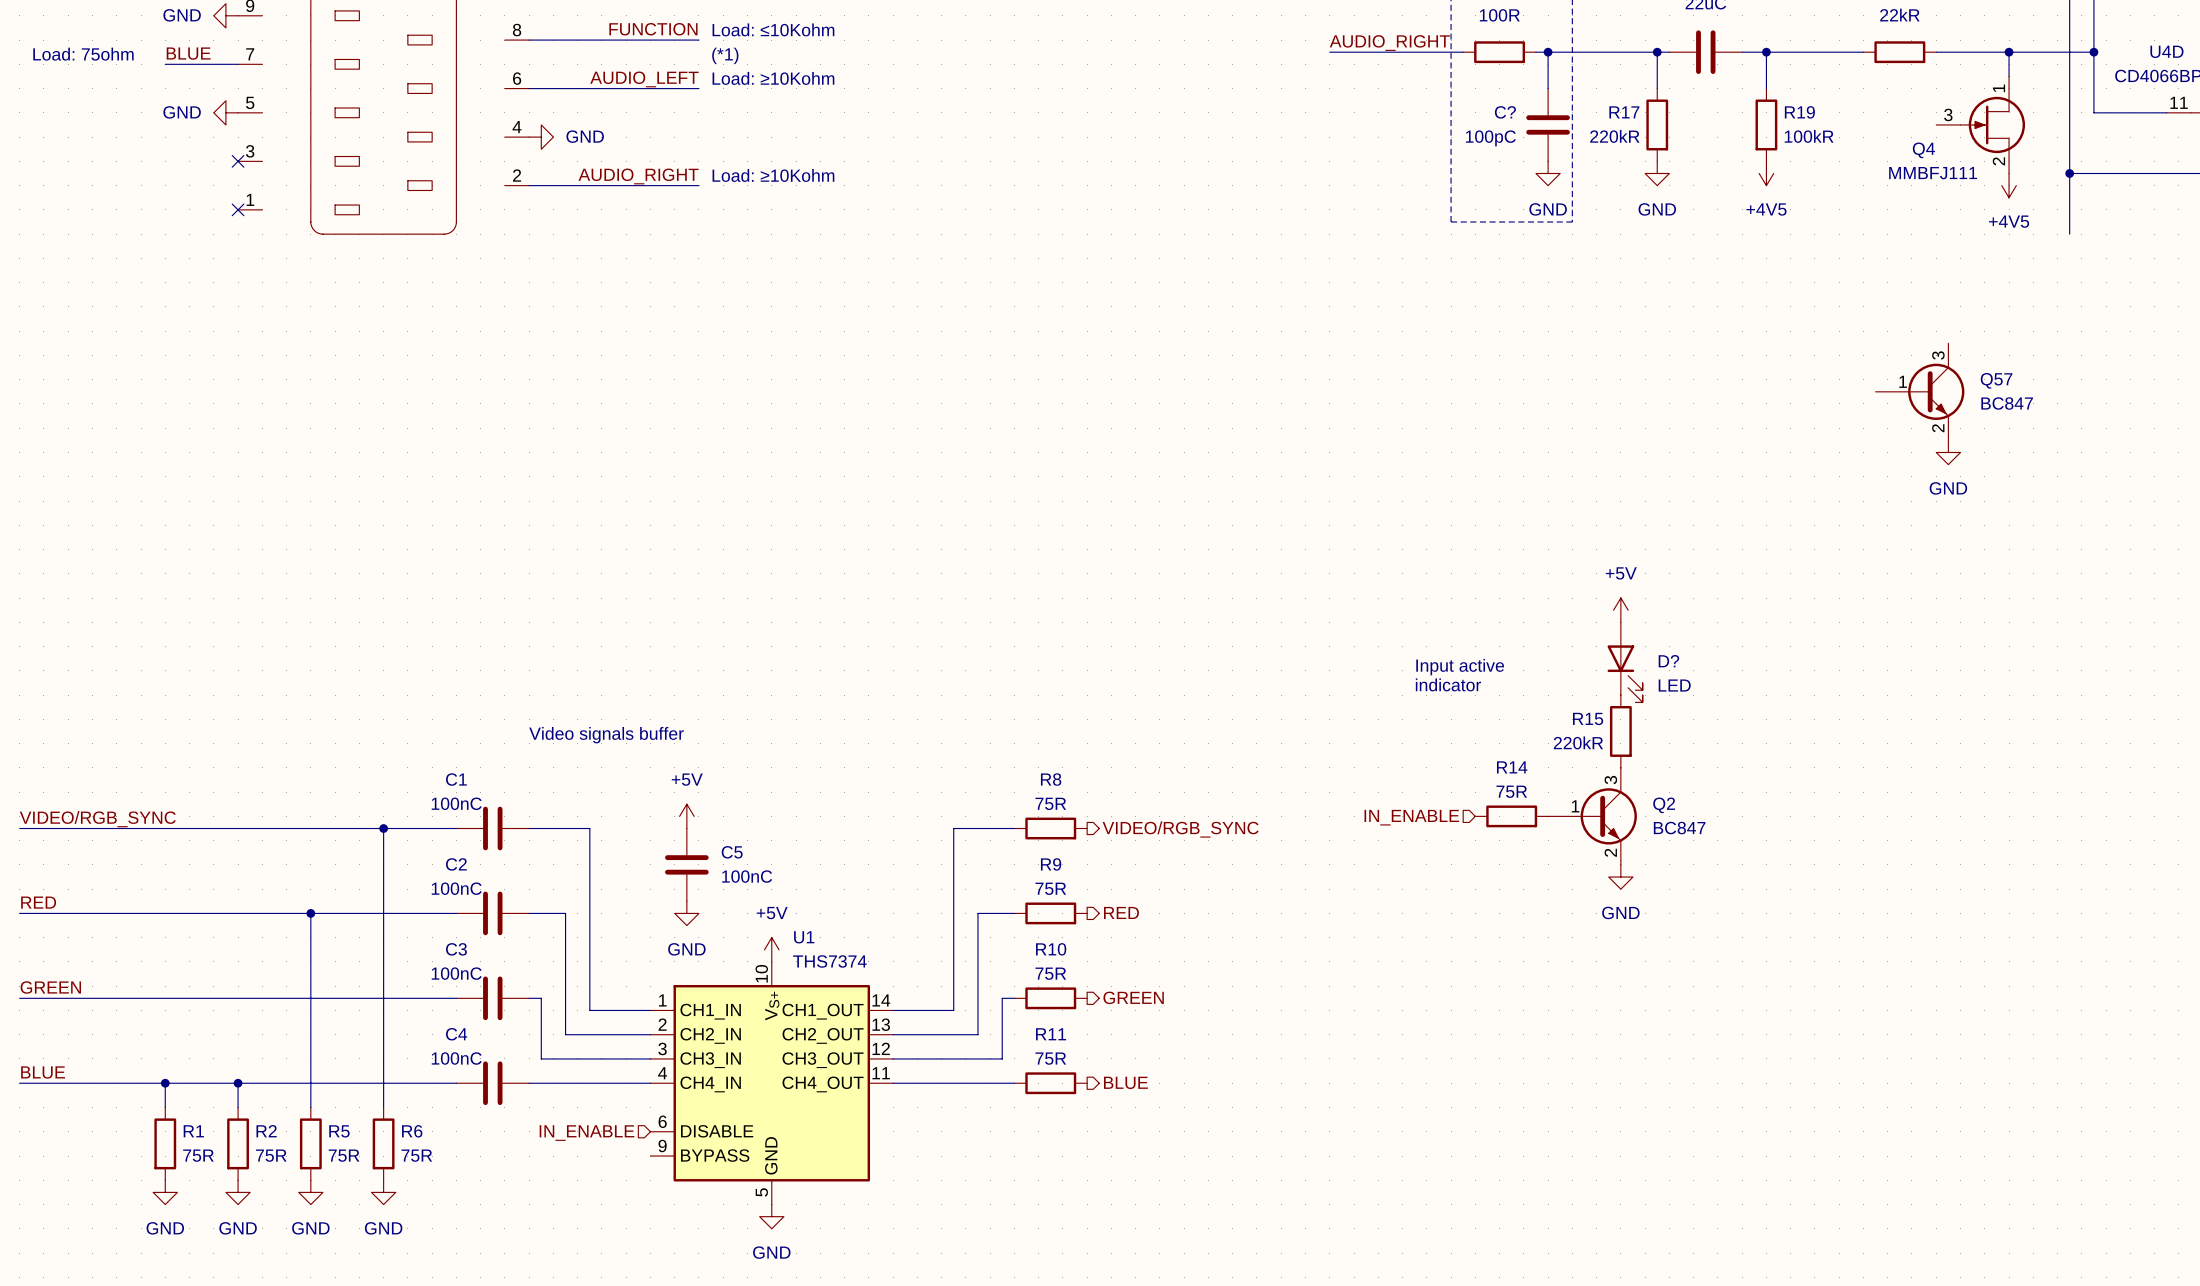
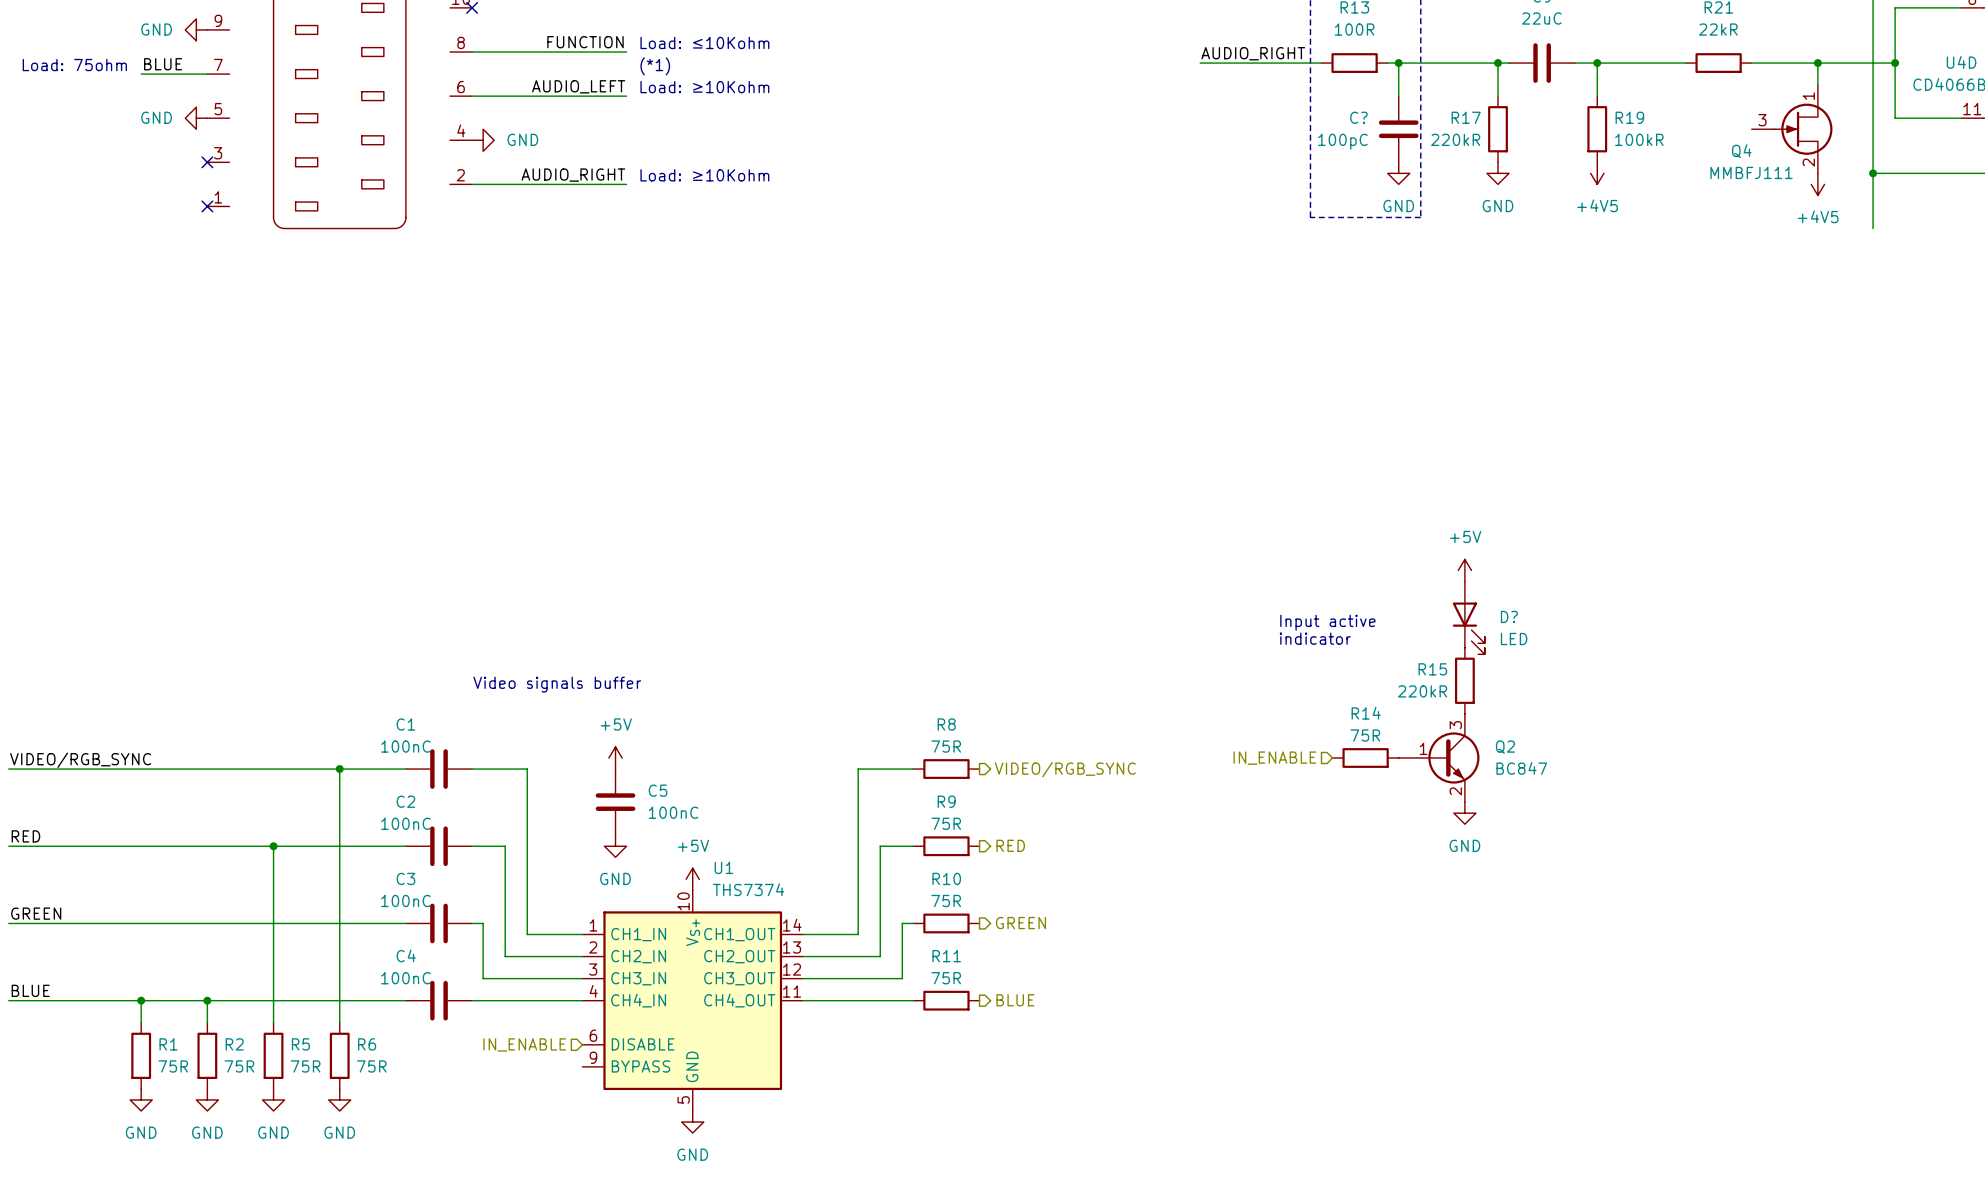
Q57: BC847 (1919, 391) -> none
power symbol: GND (1948, 452) -> none

